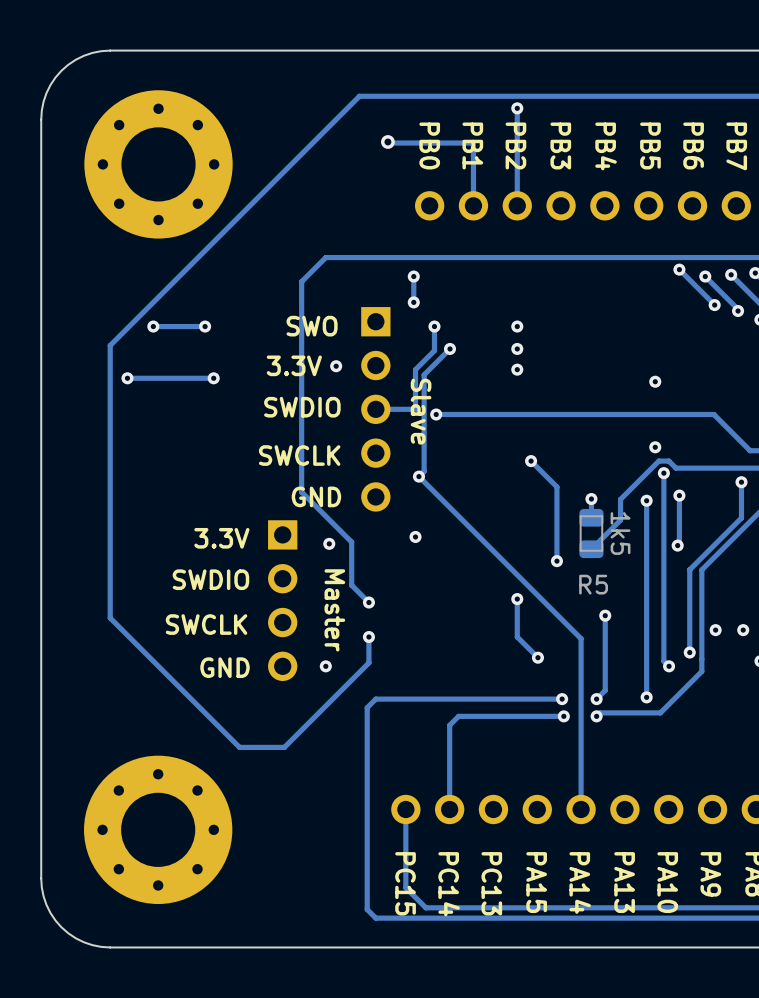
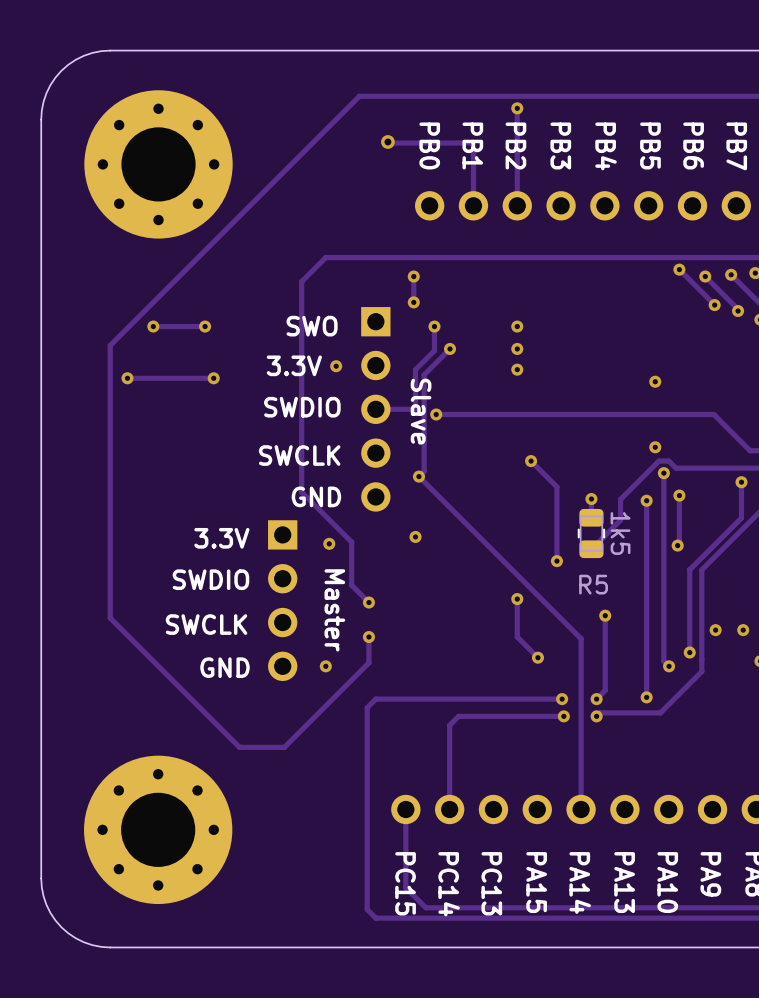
R5 footprint: [579, 508, 604, 559] -> [577, 508, 606, 559]

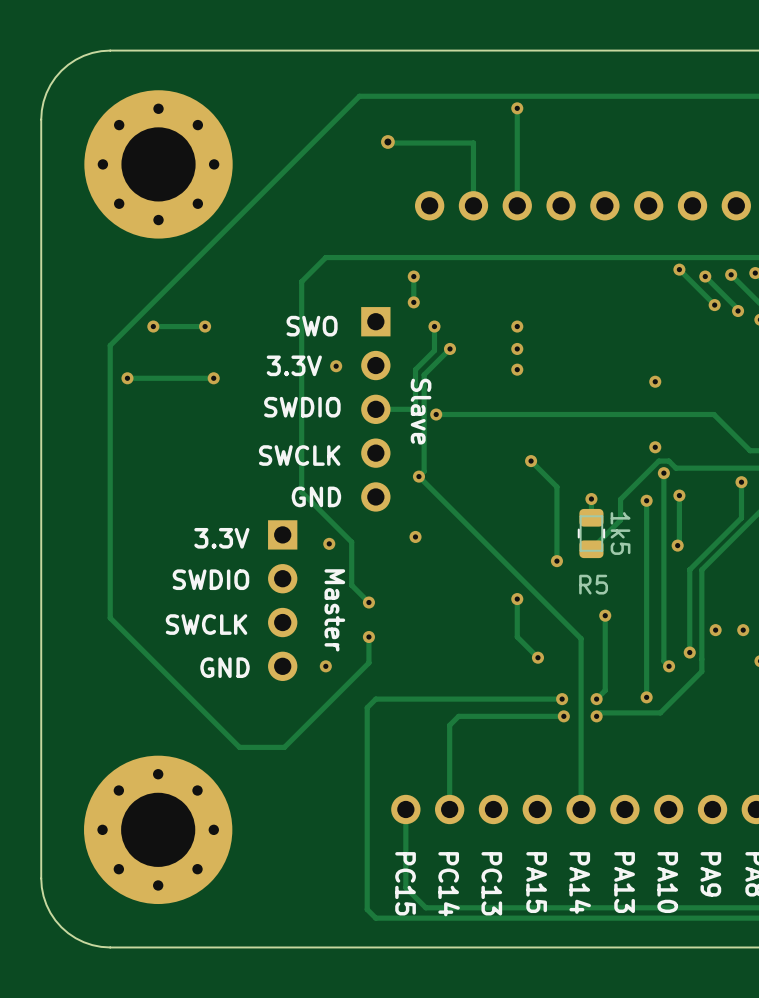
text: PB0 (429, 145) -> none
text: PB1 (472, 145) -> none
text: PB2 (515, 145) -> none
text: PB3 (560, 145) -> none
text: PB5 (650, 145) -> none
text: PB6 (693, 145) -> none
text: PB4 (606, 146) -> none
text: PB7 (736, 146) -> none

